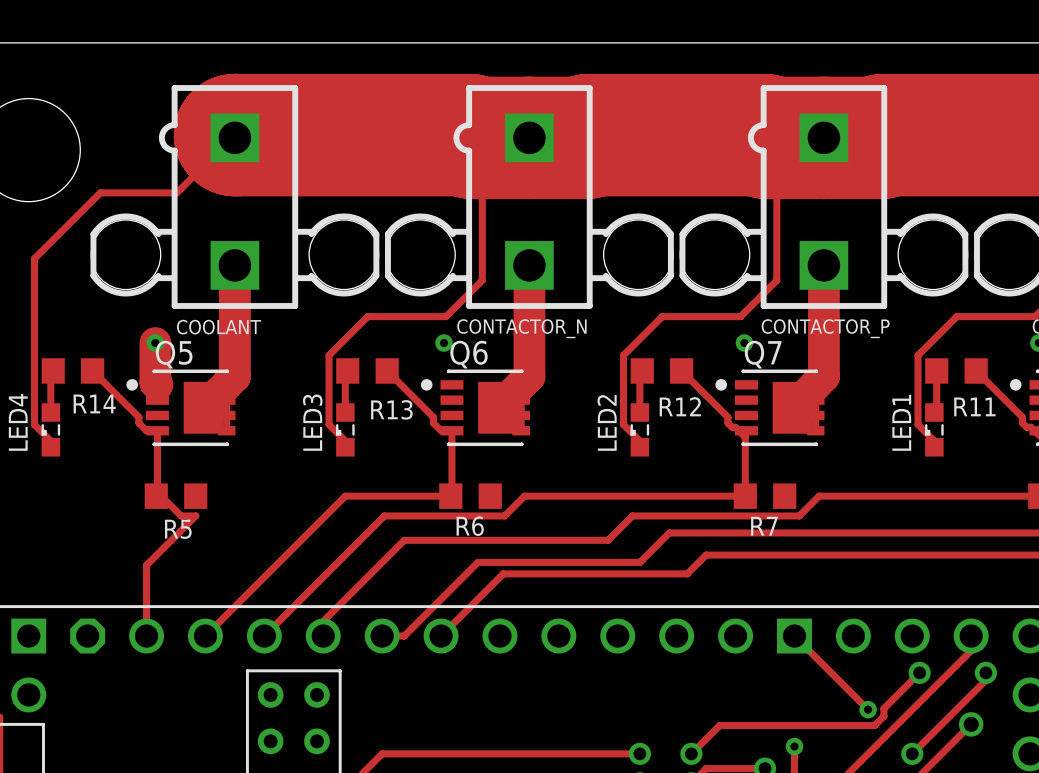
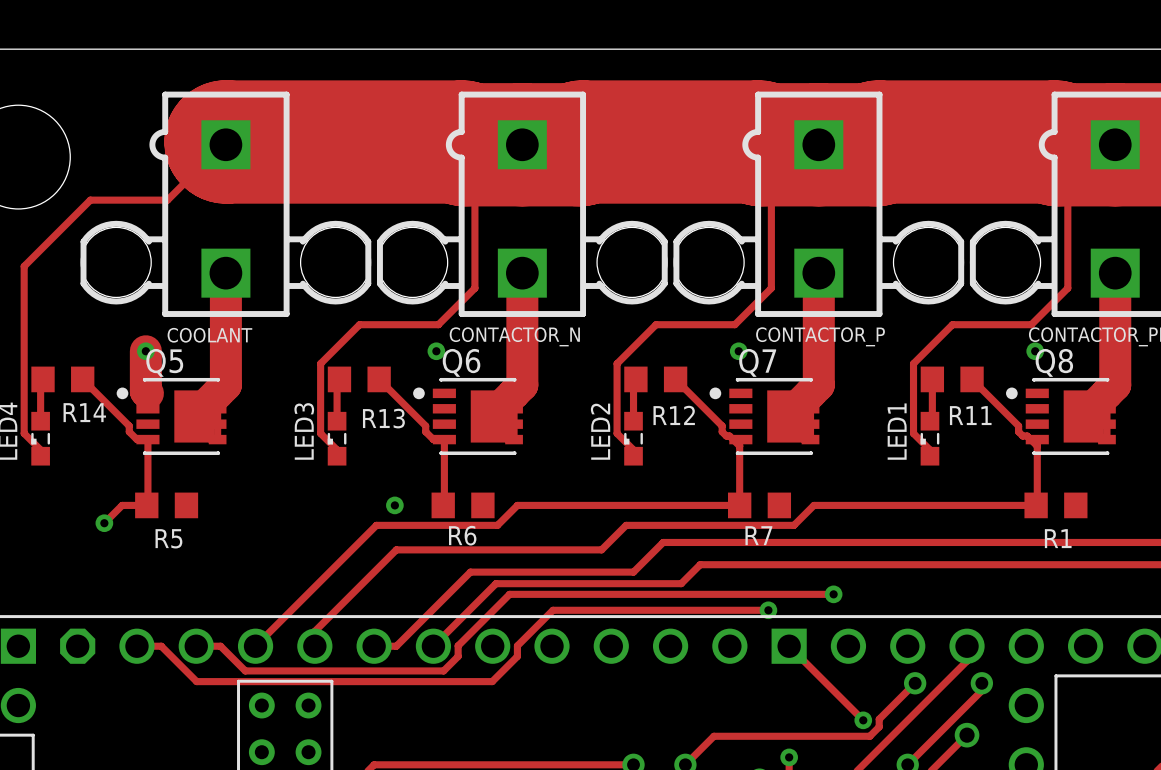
track: (156, 496) (161, 496) (181, 515) (195, 515) (146, 565) (146, 636) -> (146, 505) (122, 505) (104, 523)
via: none -> (394, 505)
track: (450, 496) (345, 496) (205, 636) -> (833, 594) (509, 594) (458, 645) (458, 656) (443, 670) (245, 670) (220, 646) (196, 646)
via: none -> (104, 523)
via: none -> (833, 594)
track: none -> (768, 610) (552, 610) (517, 645) (517, 656) (492, 681) (196, 681) (161, 646) (136, 646)
via: none -> (768, 610)

